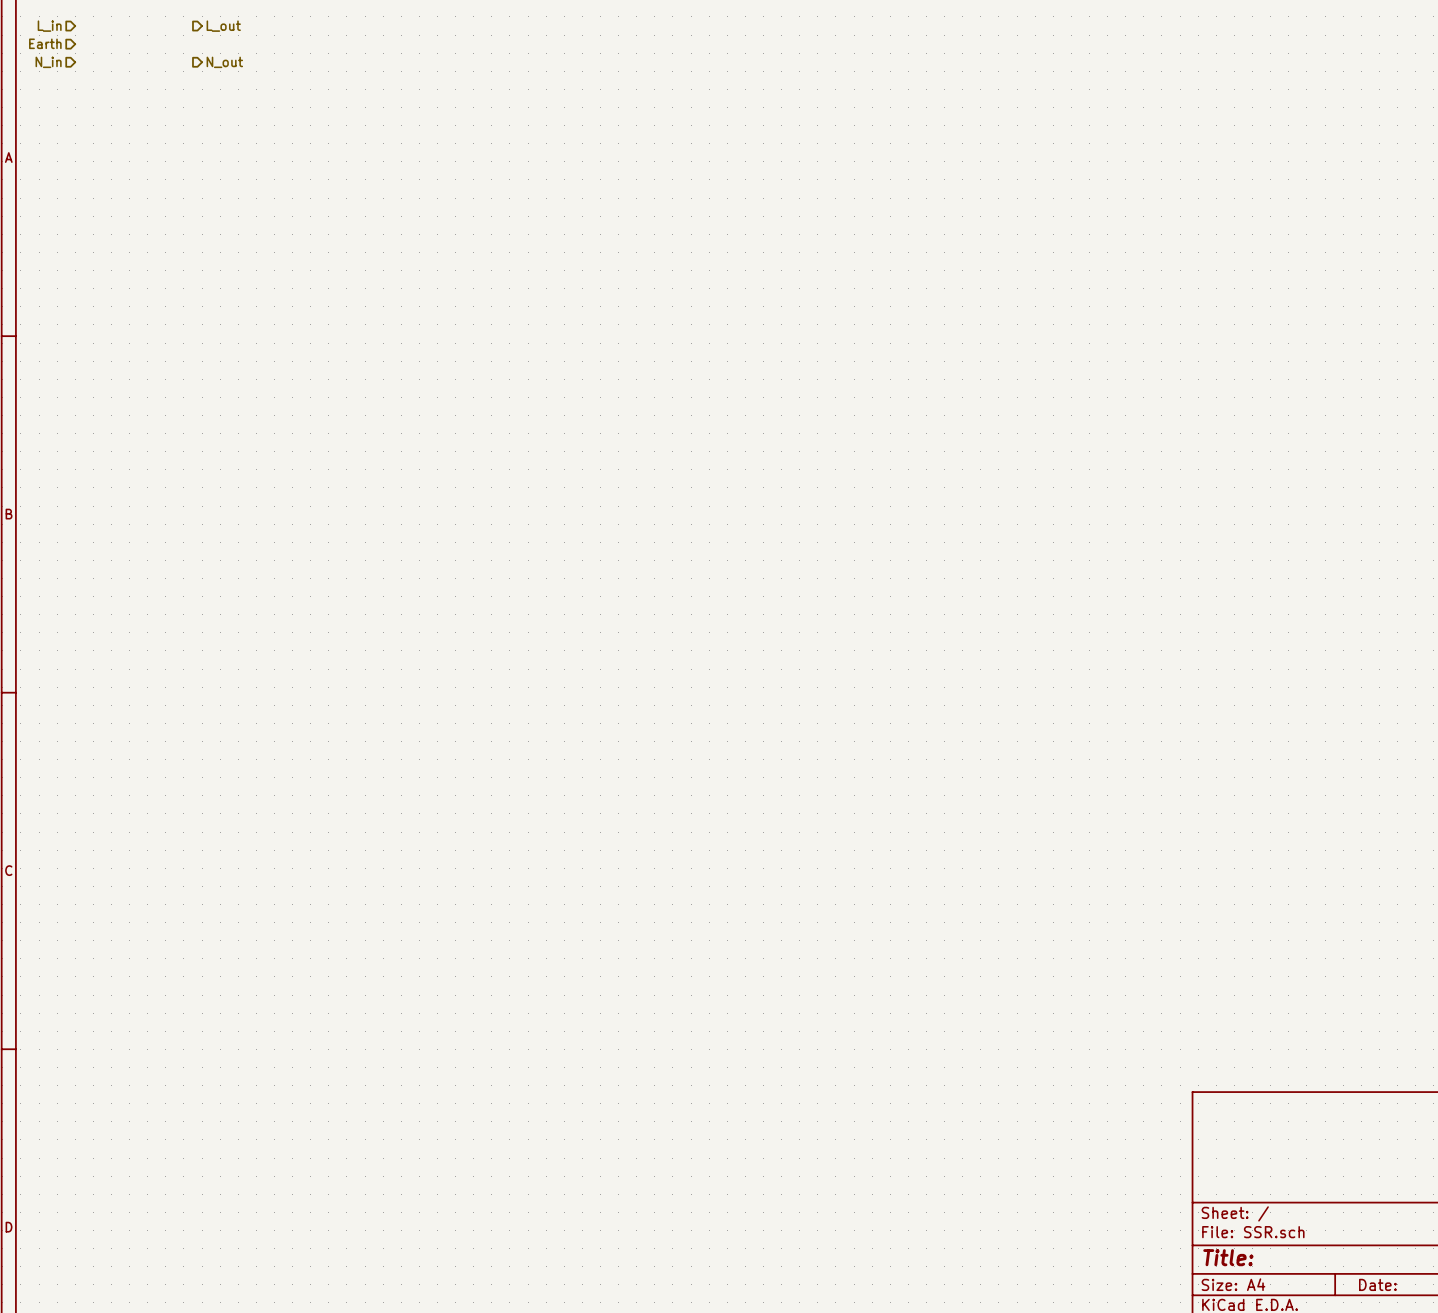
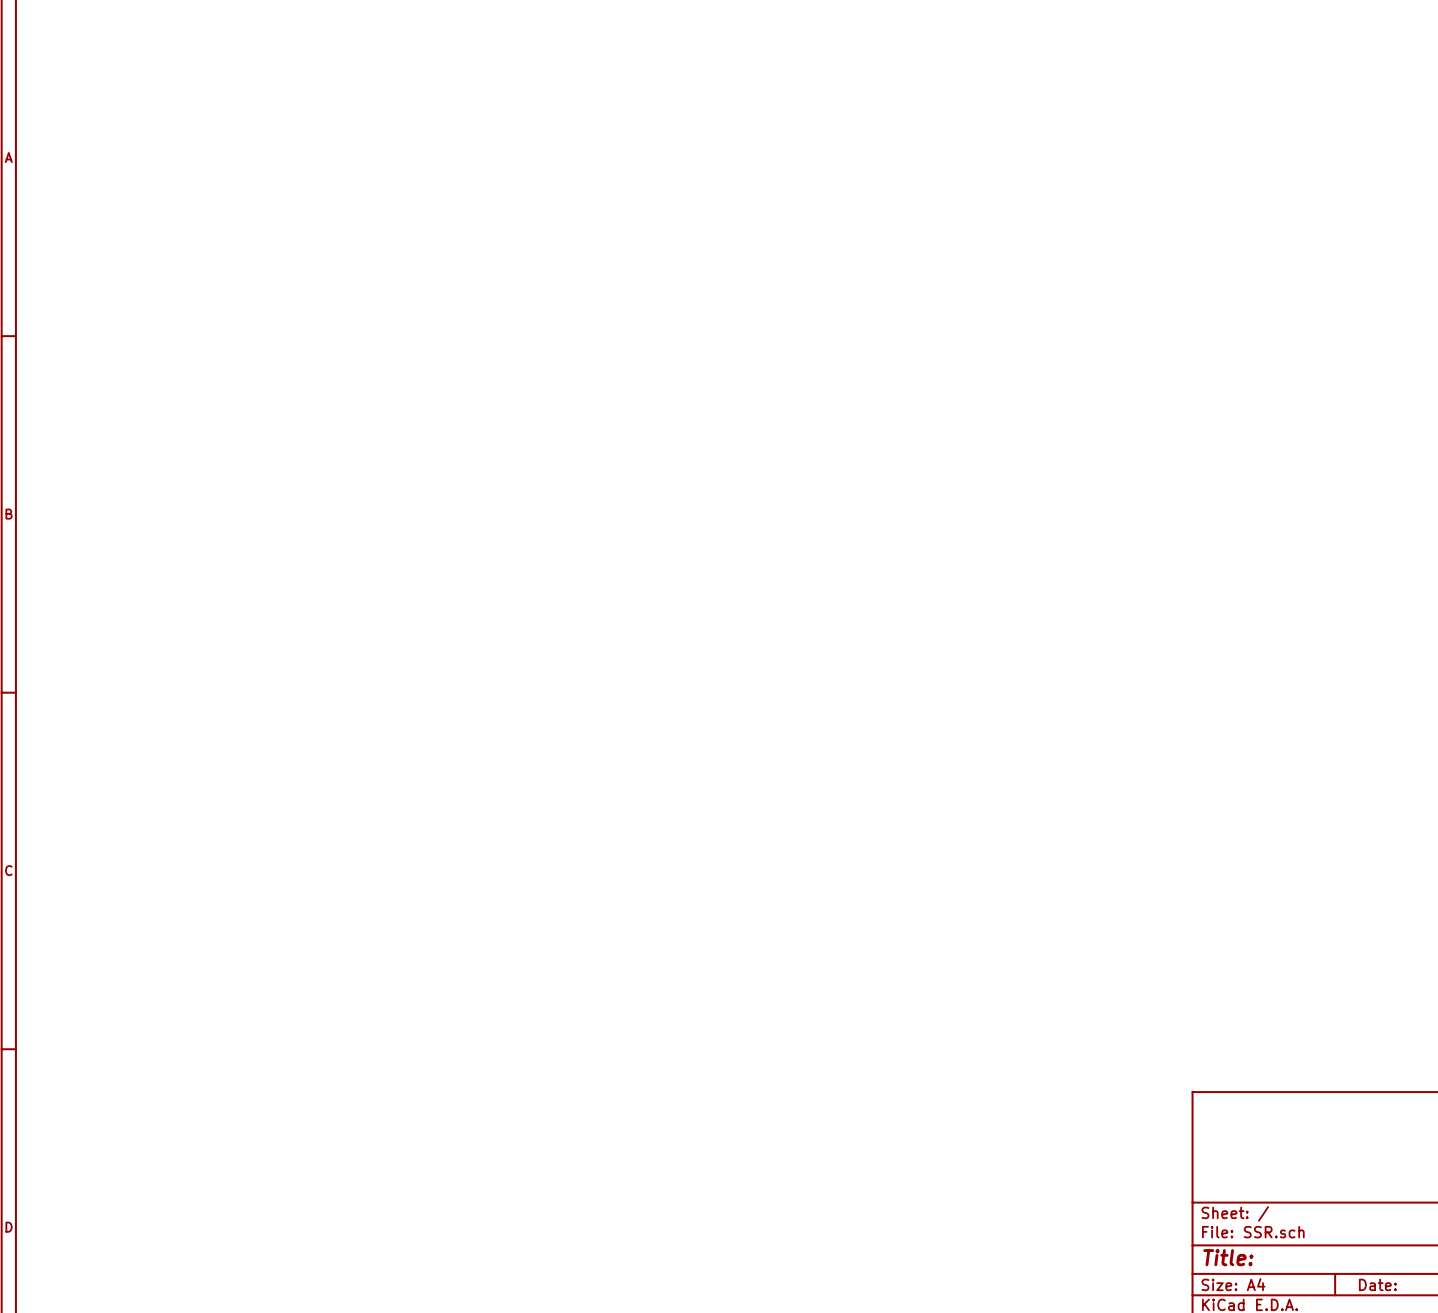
hierarchical label: L_in (49, 26) -> none
hierarchical label: L_out (223, 26) -> none
hierarchical label: Earth (45, 43) -> none
hierarchical label: N_in (48, 62) -> none
hierarchical label: N_out (224, 62) -> none

